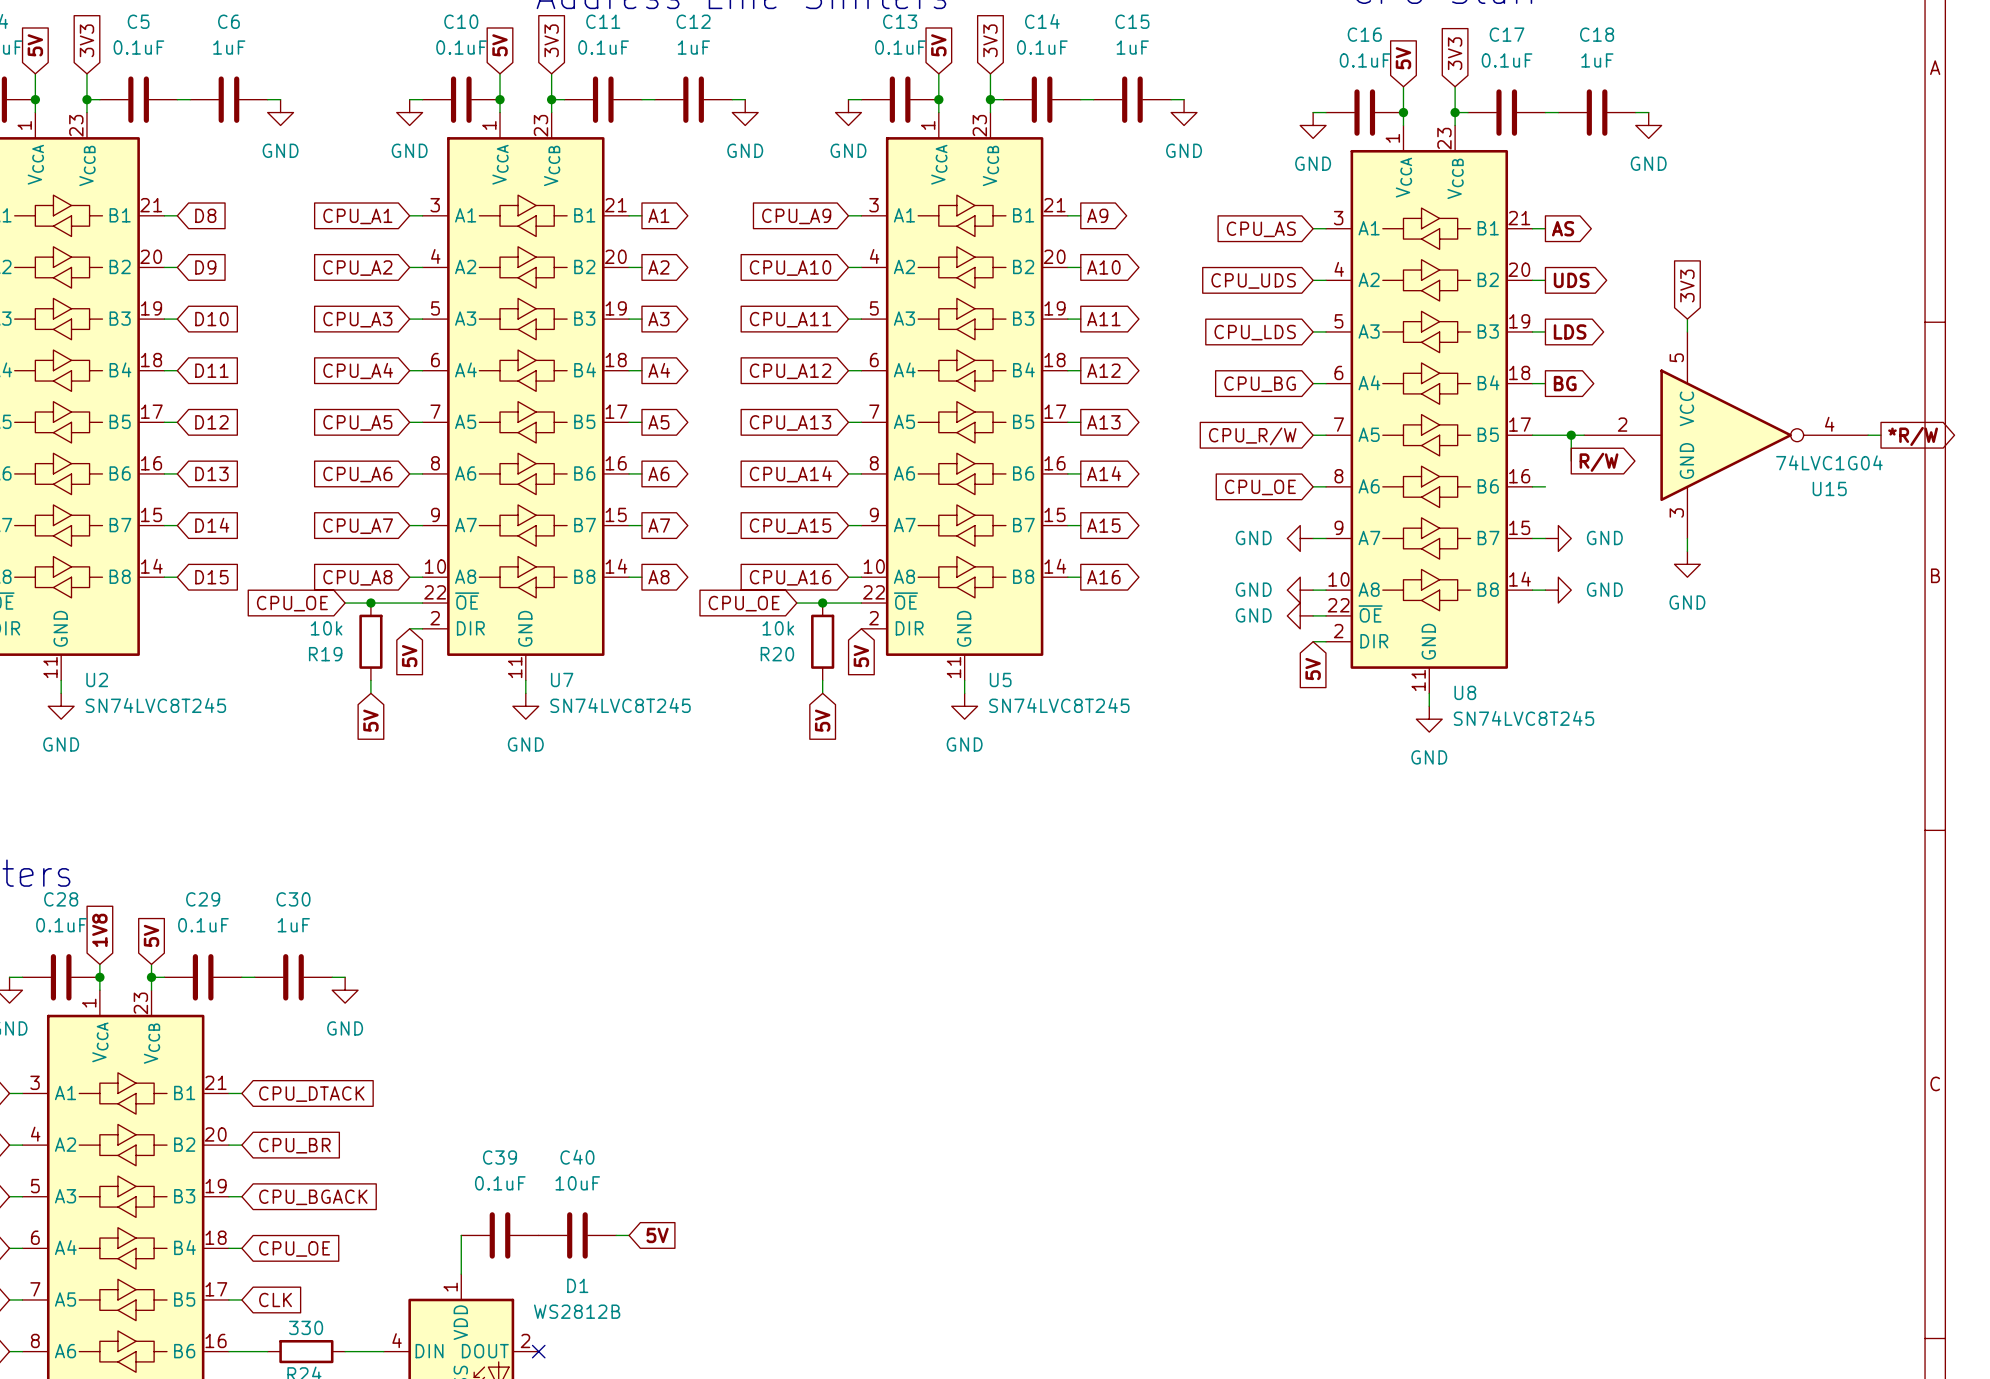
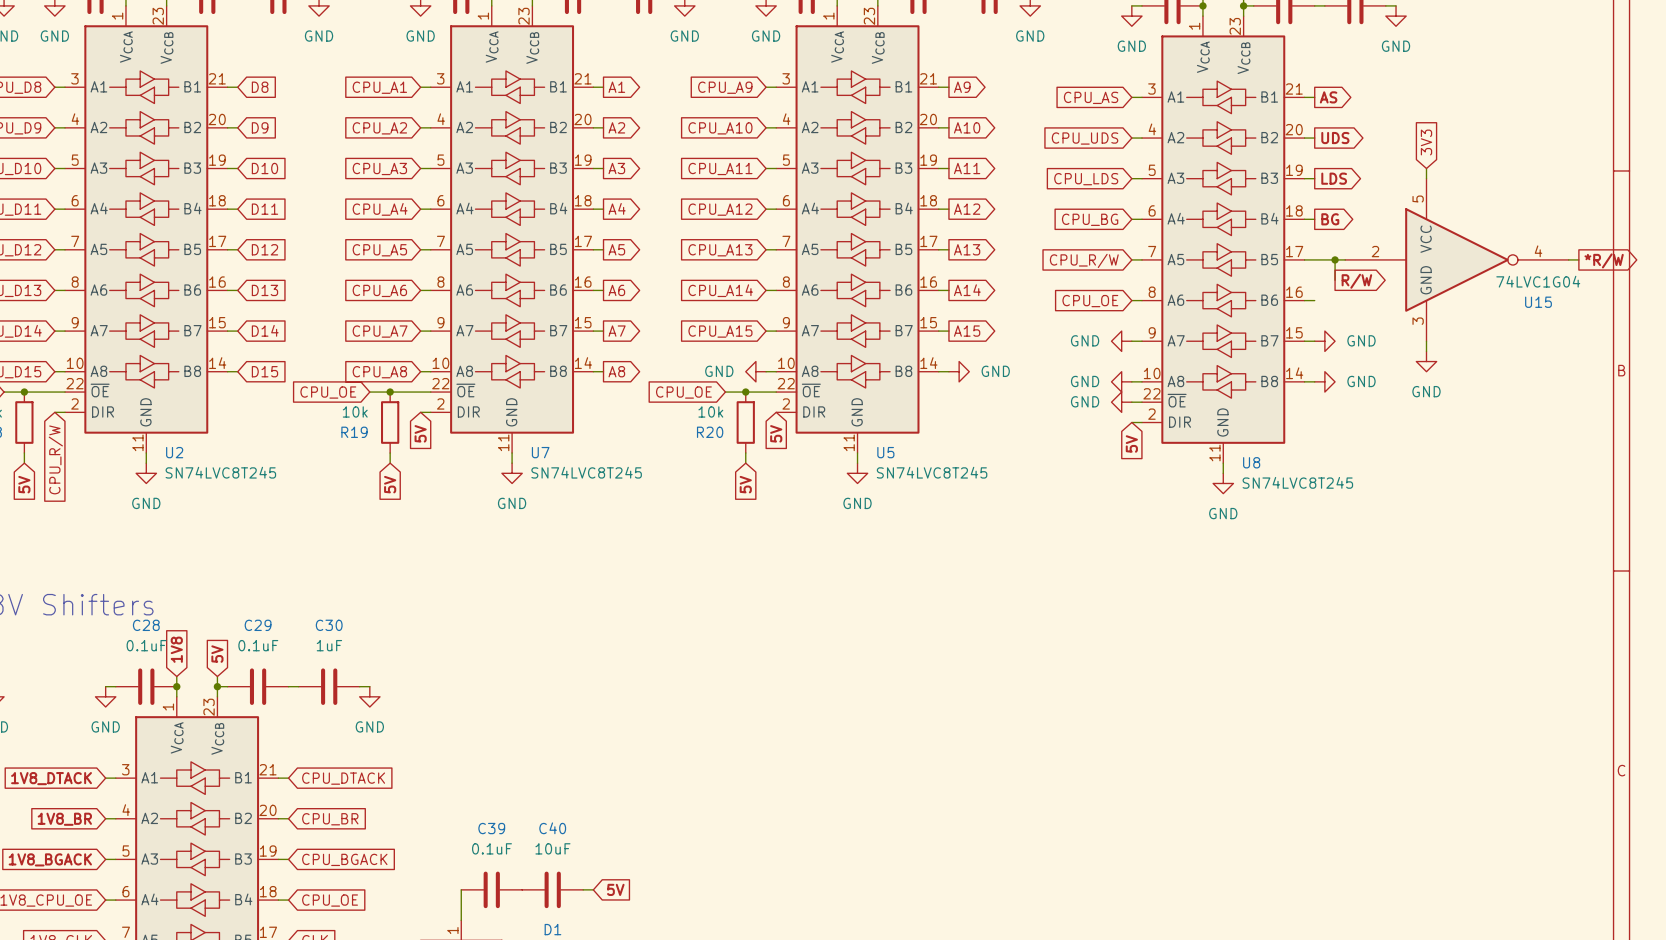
global label: CPU_A16 (790, 577) -> none
power symbol: none -> GND (755, 371)
power symbol: none -> GND (959, 371)
global label: A16 (1103, 577) -> none

